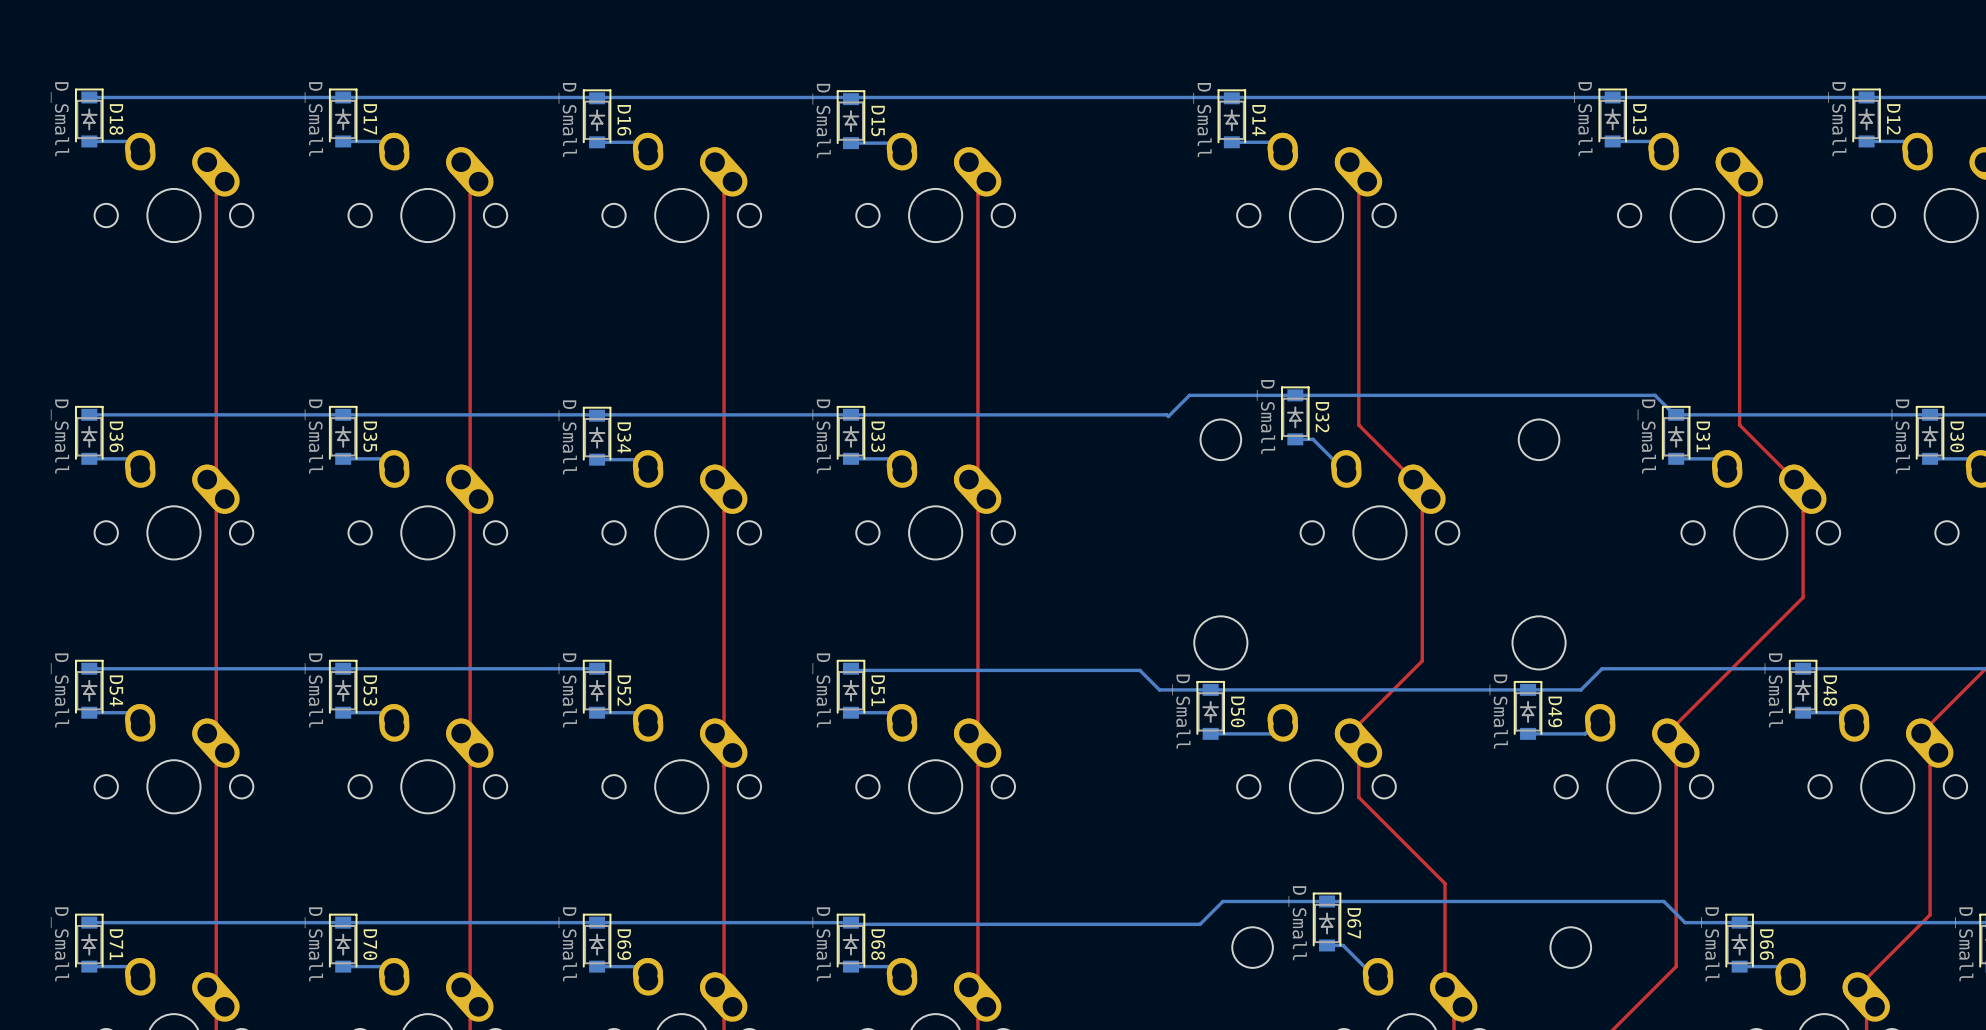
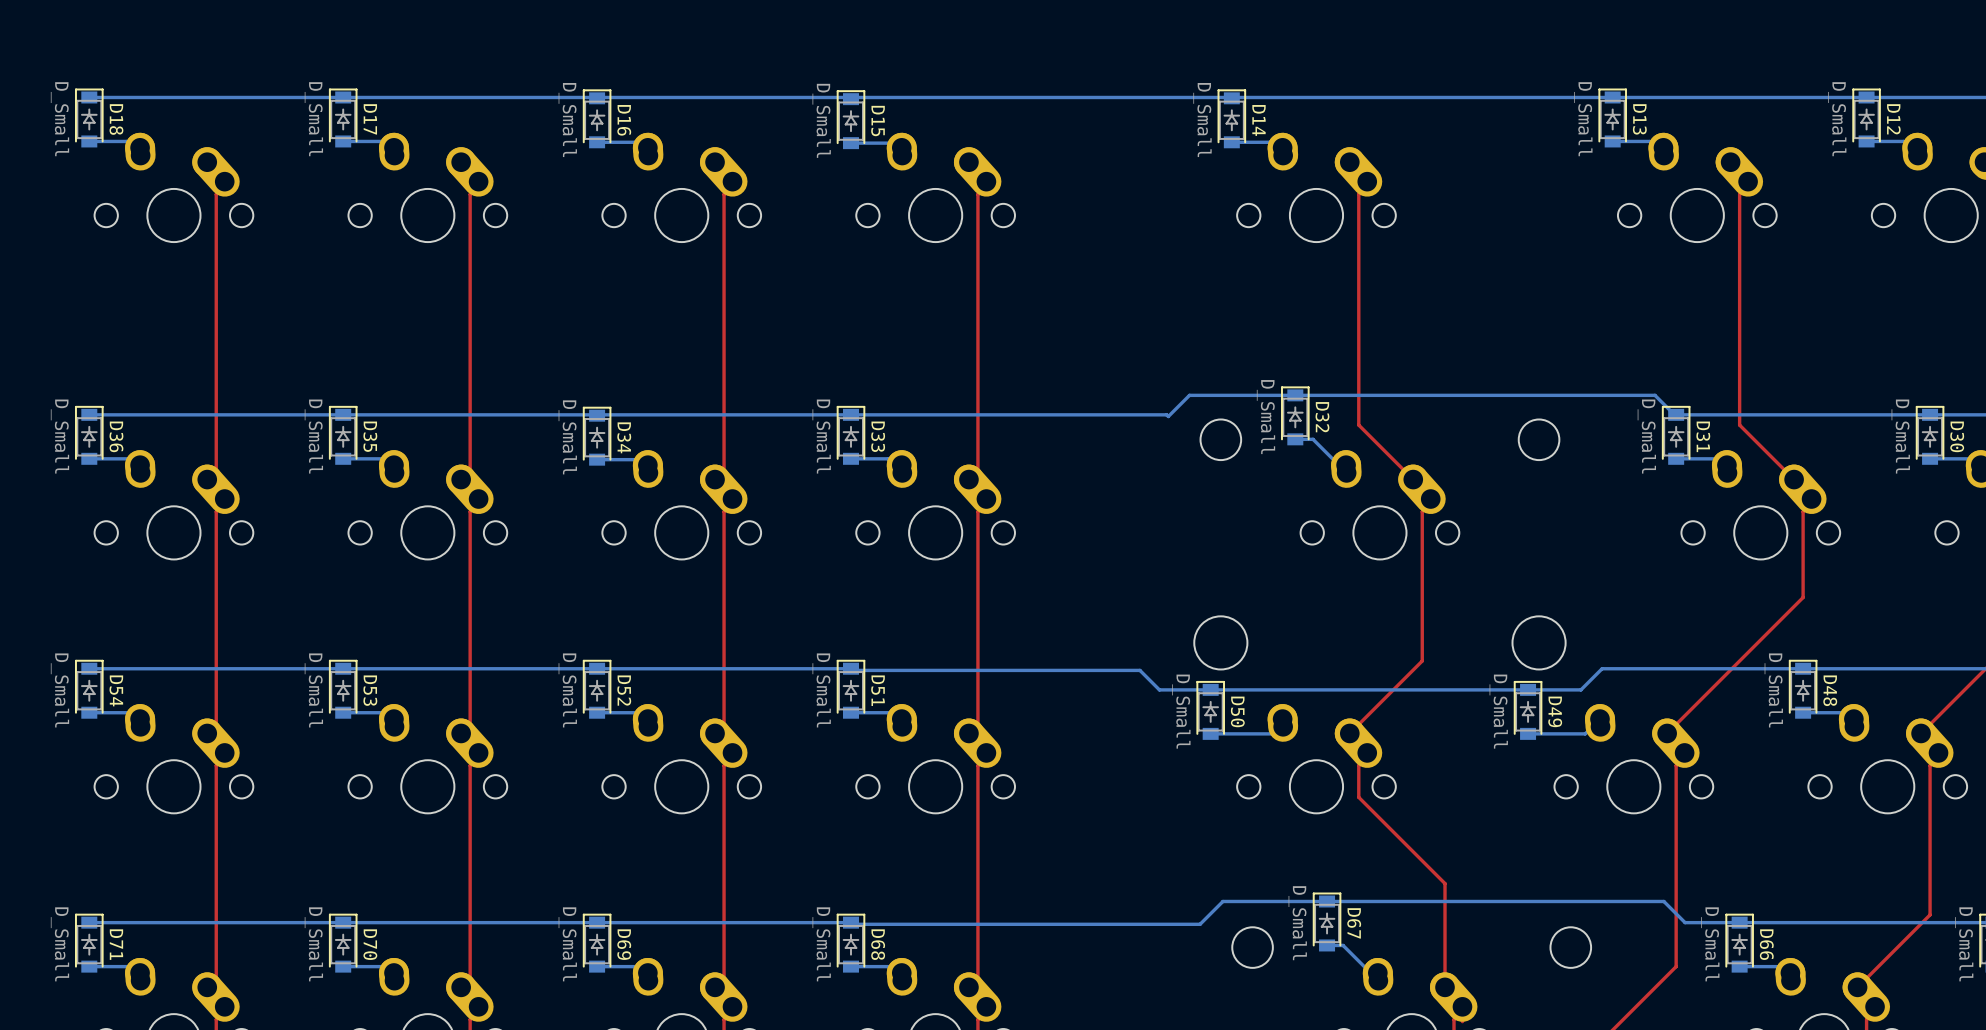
bottom track: none -> (850, 668) (597, 668)

